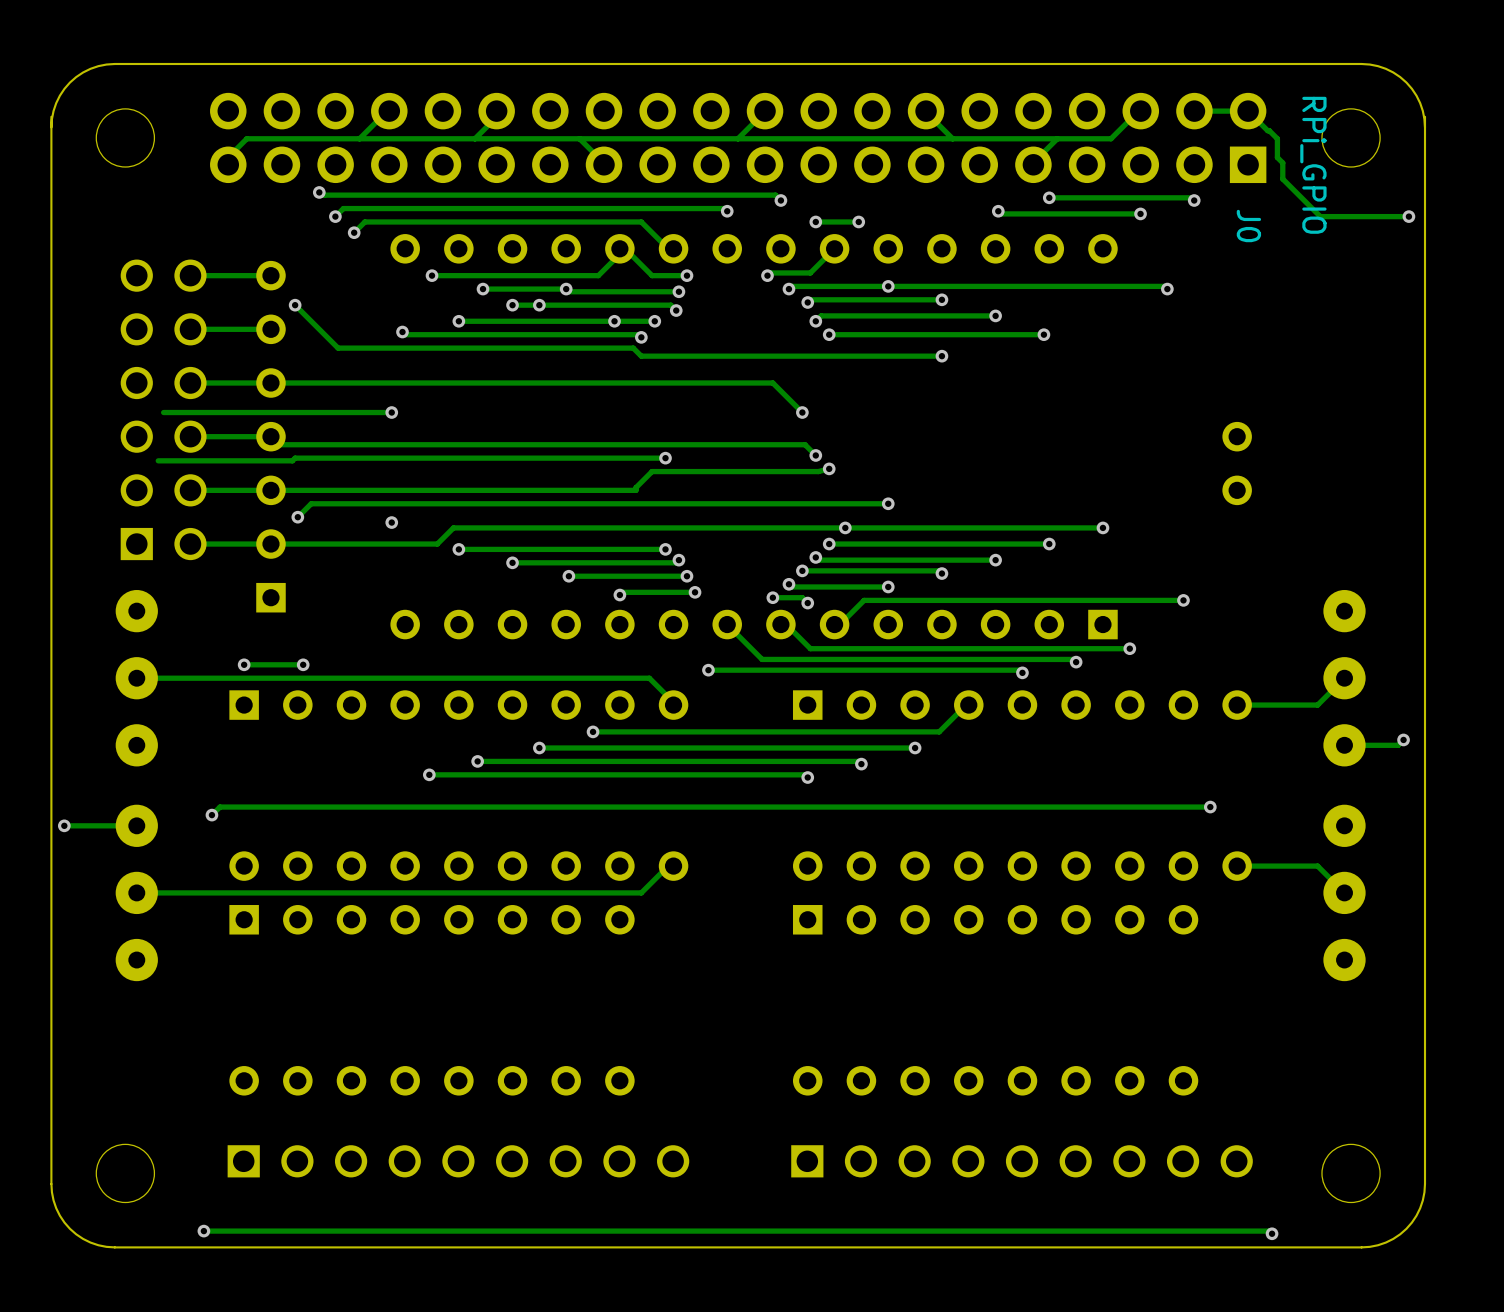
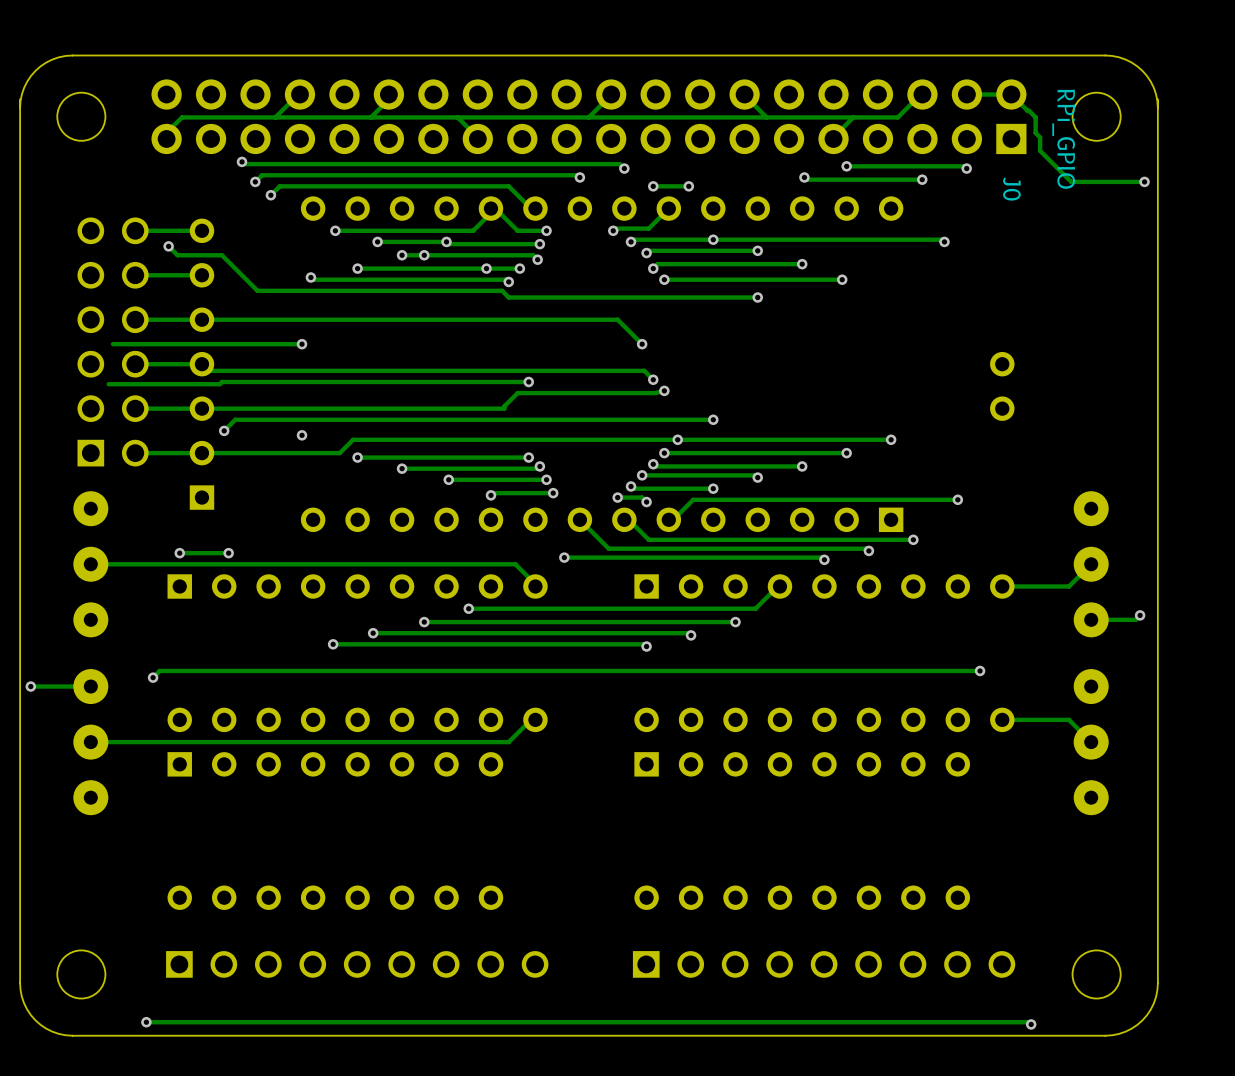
track: none -> (168, 246) (177, 255) (221, 255)
via position: (295, 305) -> (168, 246)

